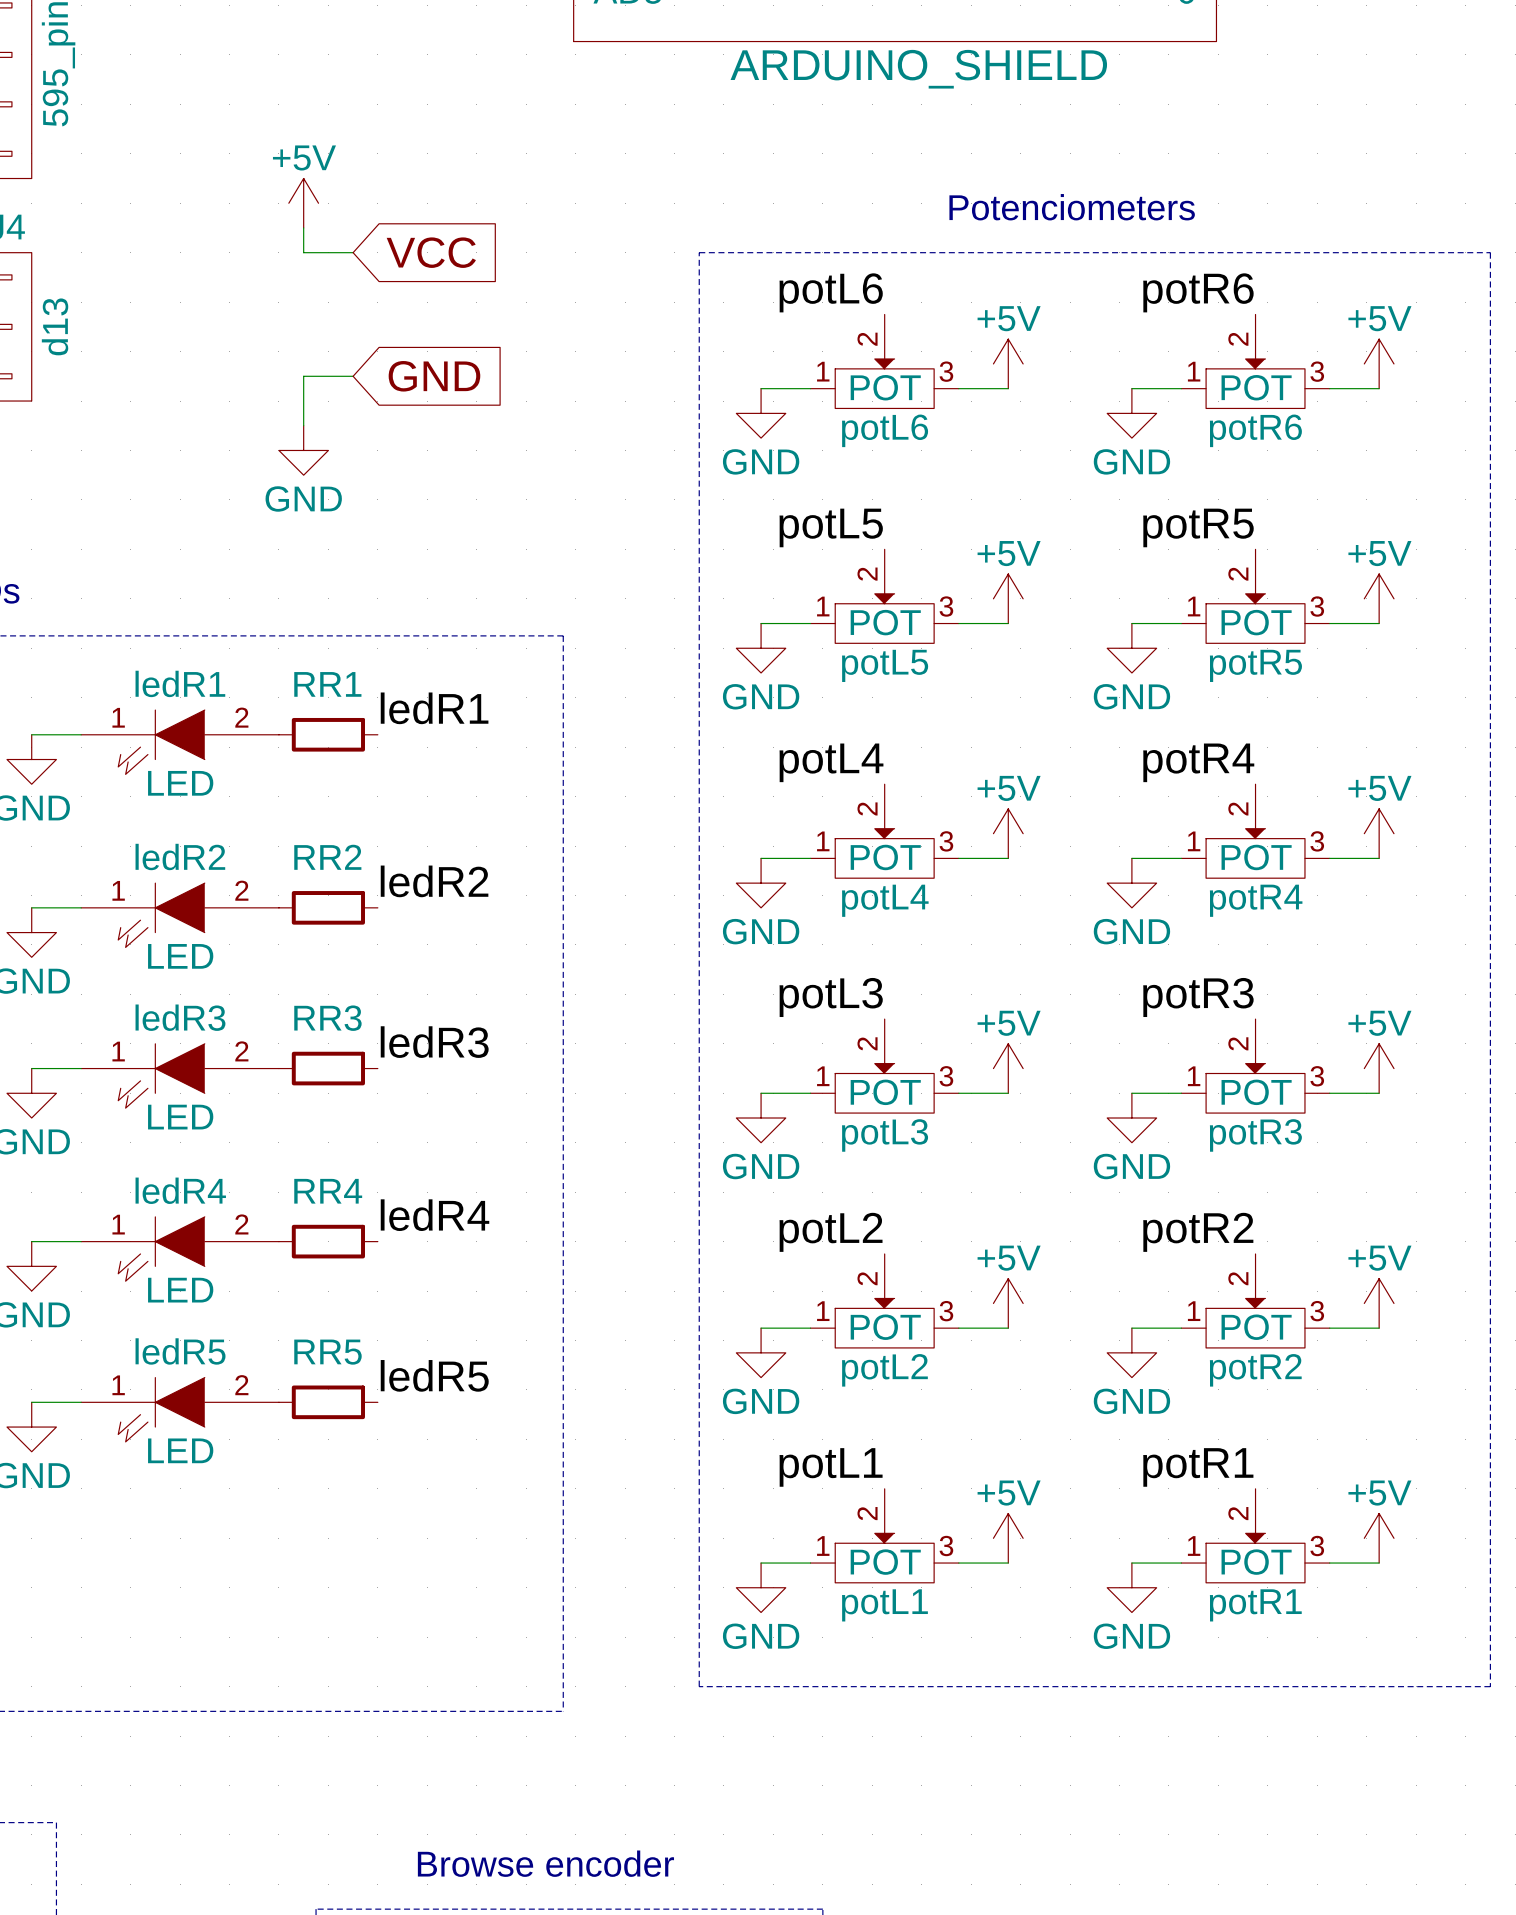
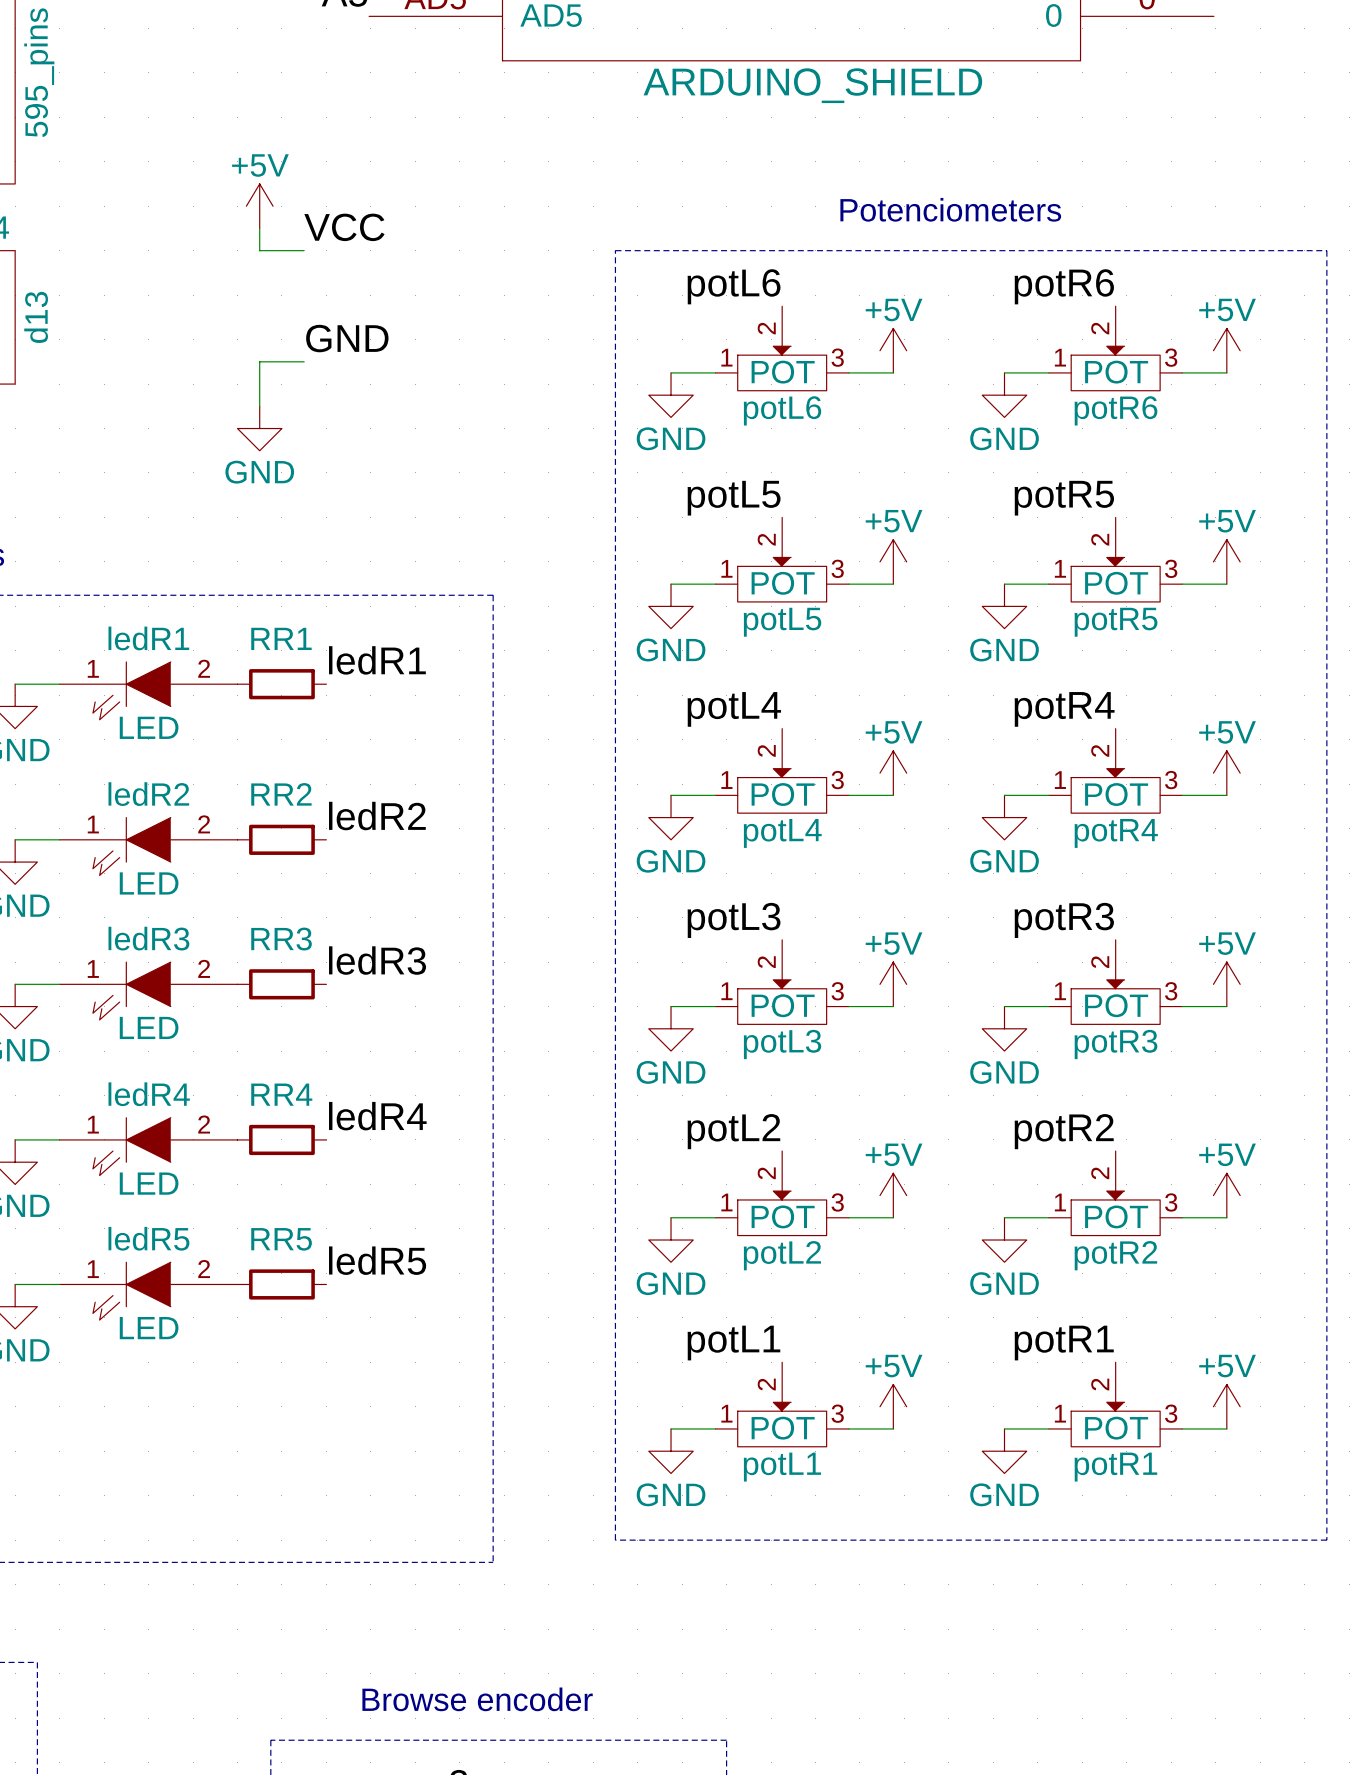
label: none -> VCC (344, 227)
global label: VCC (431, 252) -> none
label: none -> GND (347, 338)
global label: GND (434, 376) -> none

